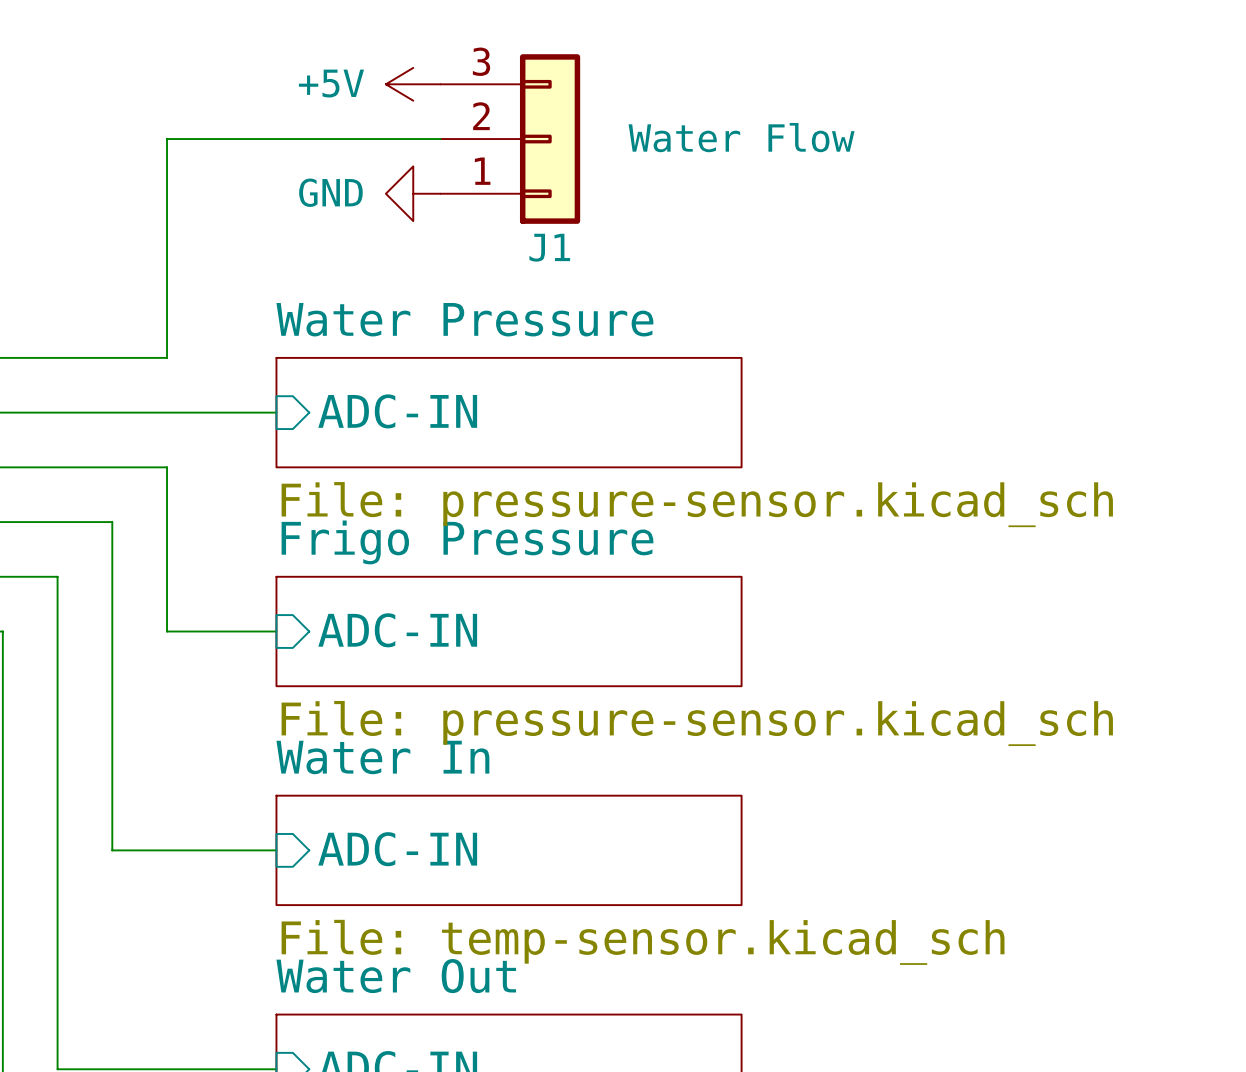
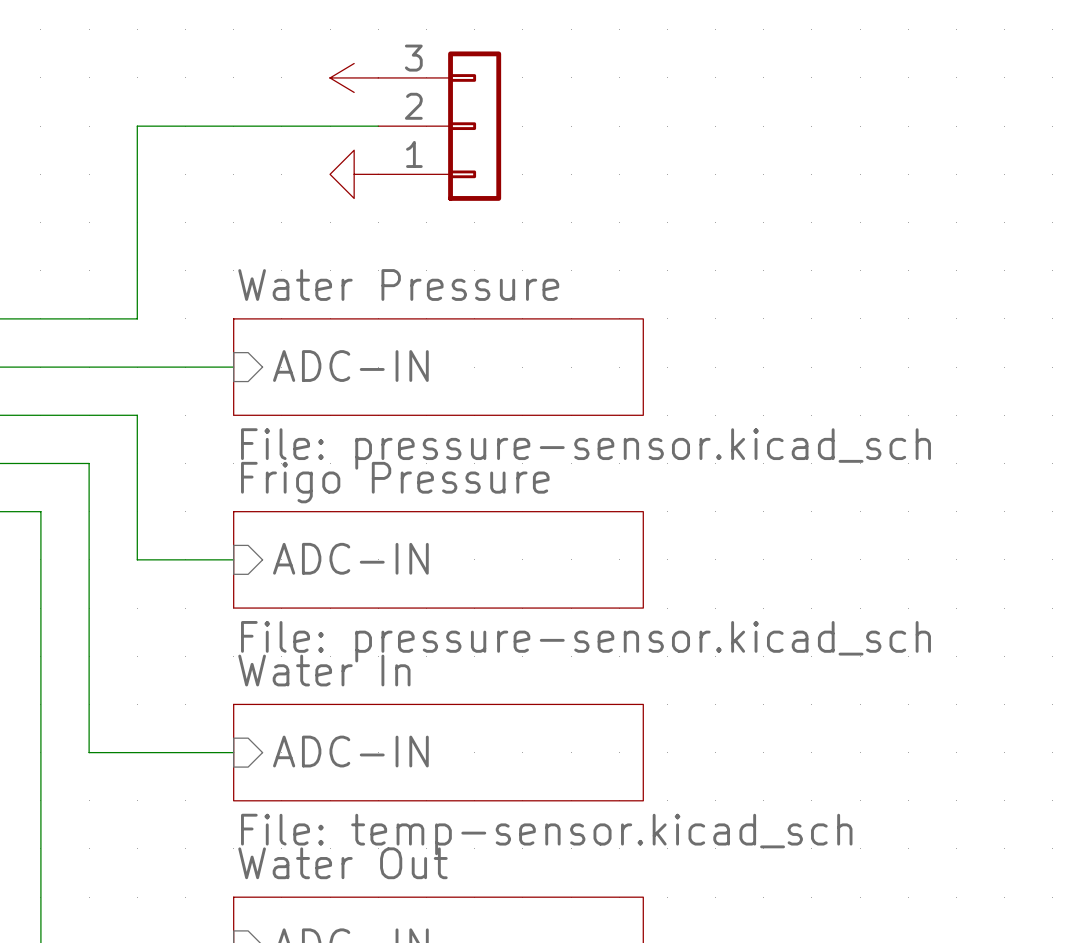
power symbol text: +5V (331, 83) -> none
J1 value: Water Flow (741, 137) -> none
power symbol text: GND (330, 192) -> none
J1 name: J1 (549, 247) -> none

